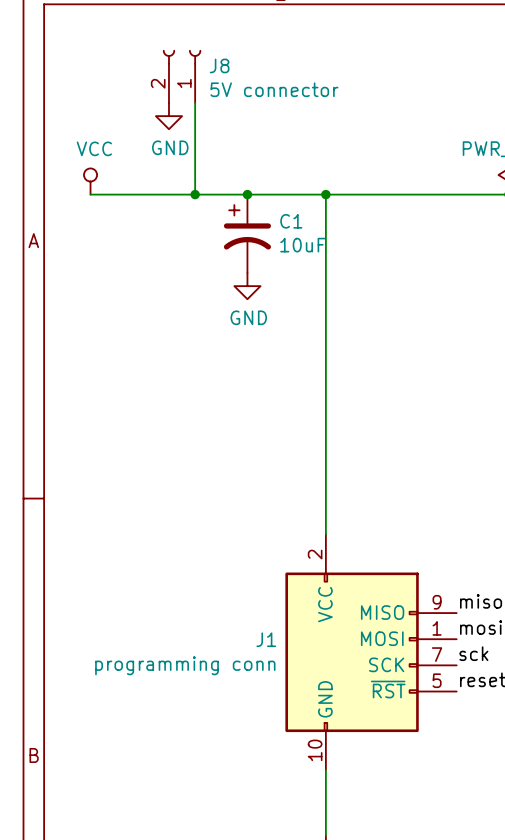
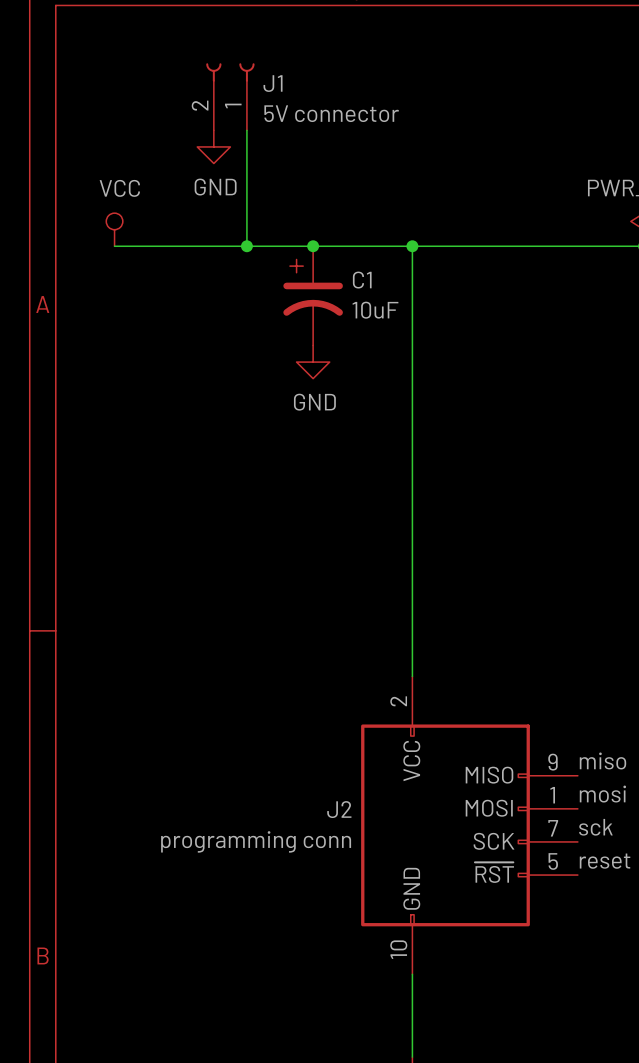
J8 name: J8 (219, 65) -> J1 (273, 83)
J1 name: J1 (266, 639) -> J2 (339, 809)

